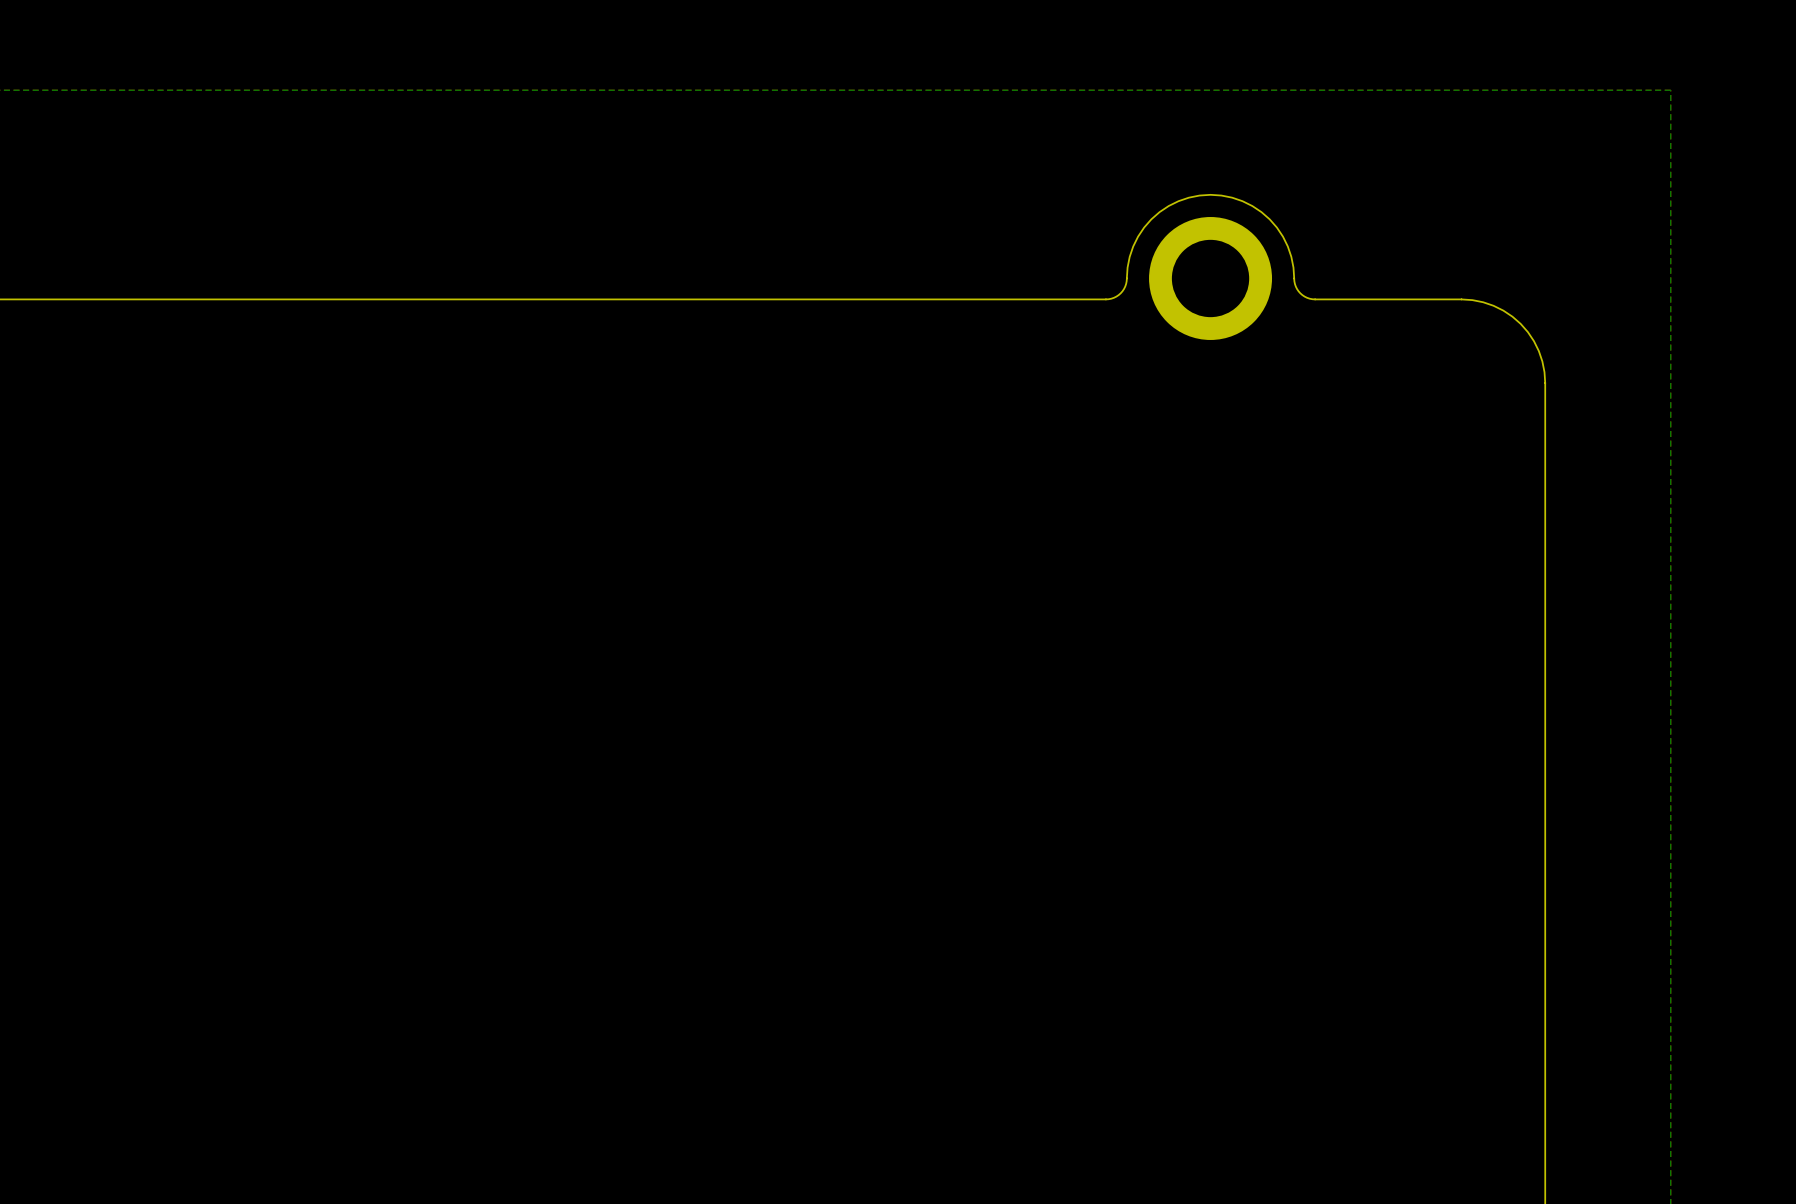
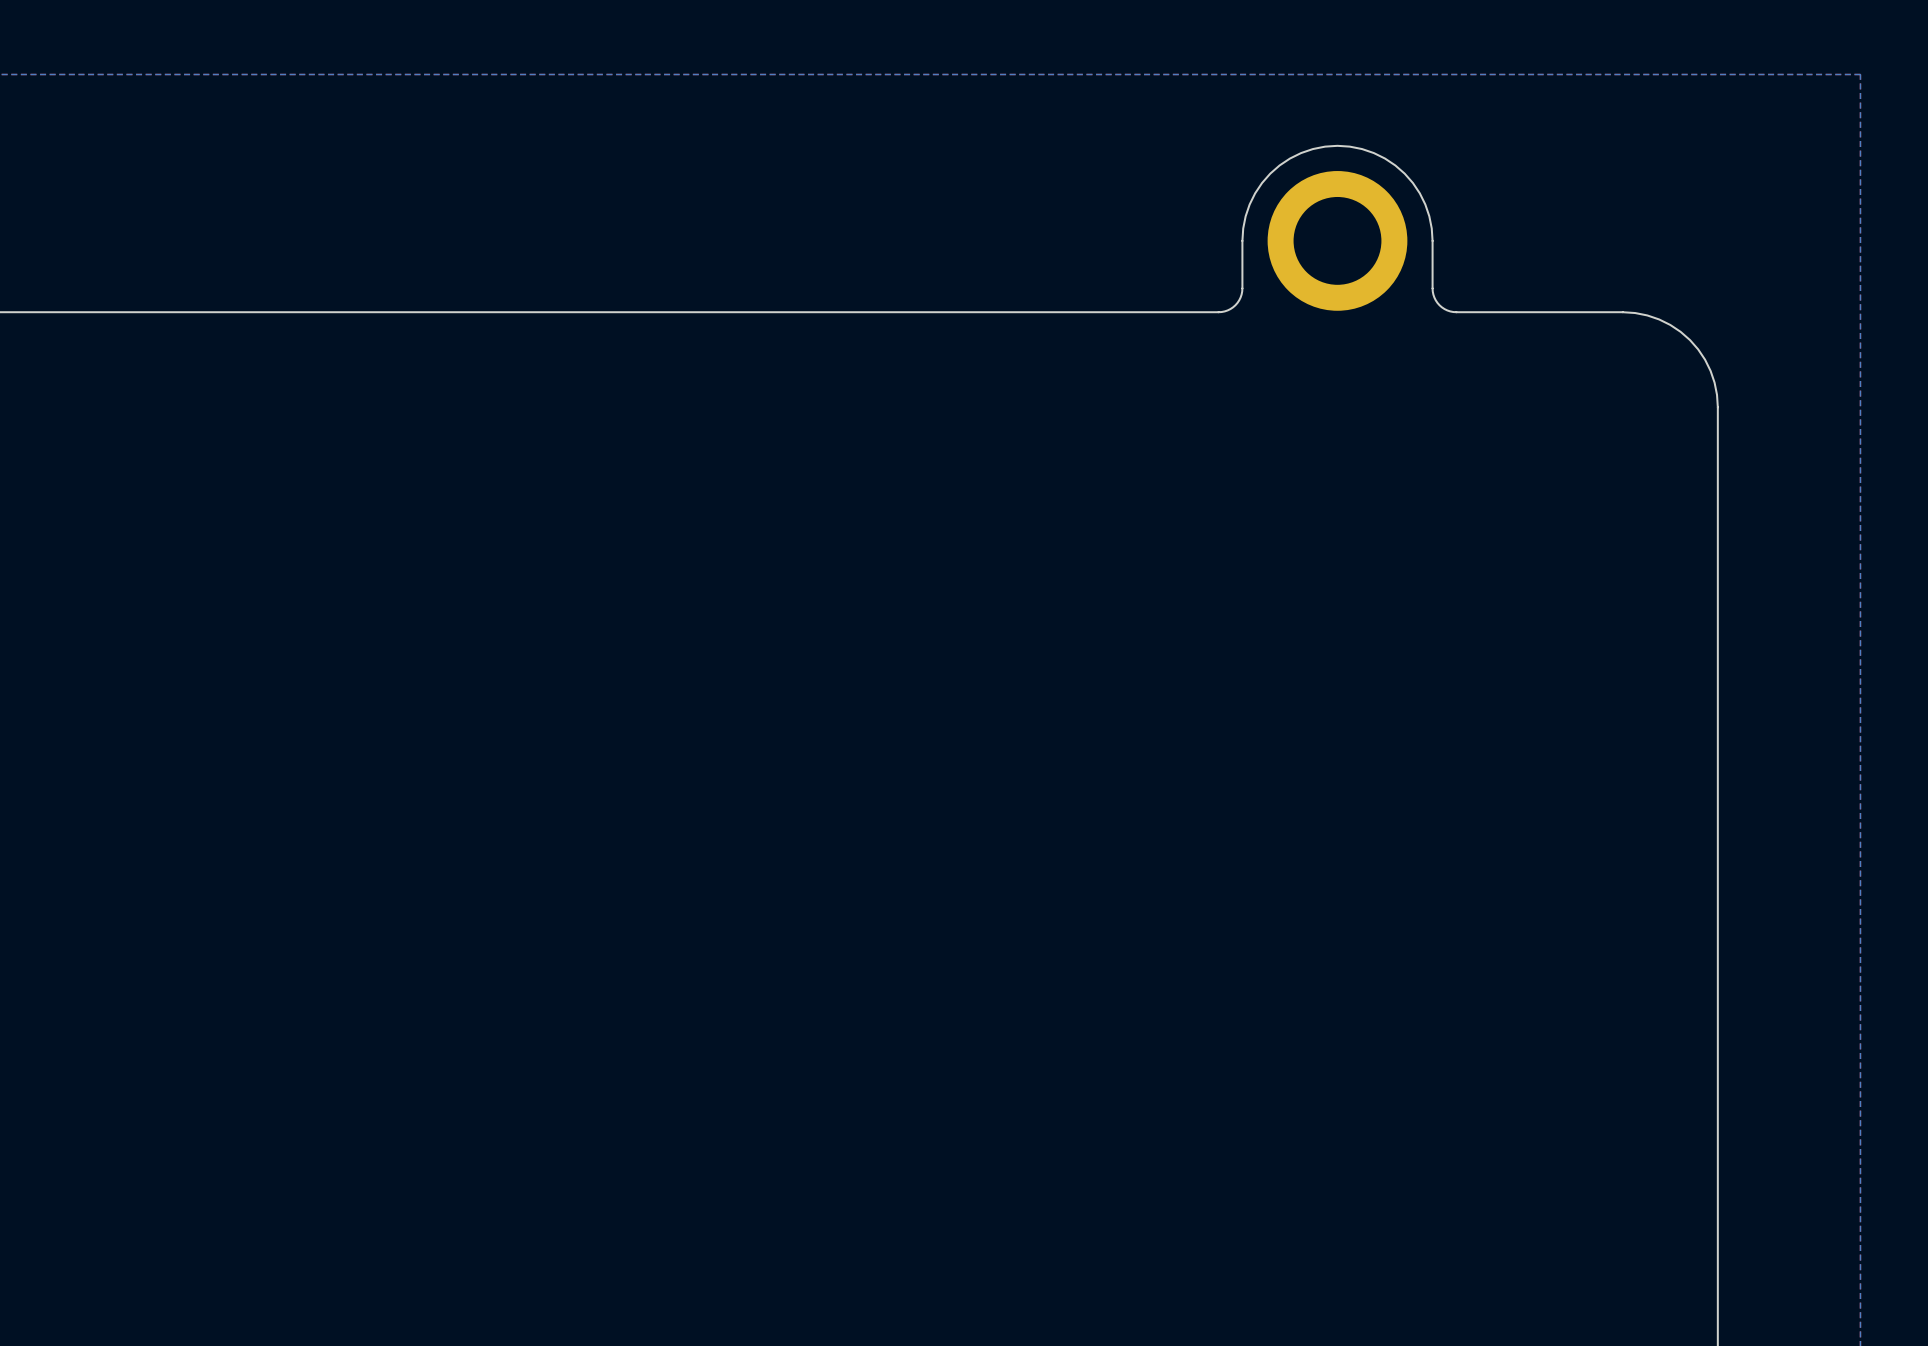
part position: (1210, 278) -> (1337, 240)
board edge: (1294, 278) (1287, 246) (1269, 219) (1242, 201) (1210, 194) (1178, 201) (1151, 219) (1133, 246) (1126, 278) -> (1432, 288) (1431, 228) (1429, 216) (1419, 193) (1404, 173) (1385, 158) (1362, 149) (1337, 145) (1312, 149) (1289, 158) (1270, 173) (1255, 193) (1245, 216) (1243, 228) (1242, 288)

